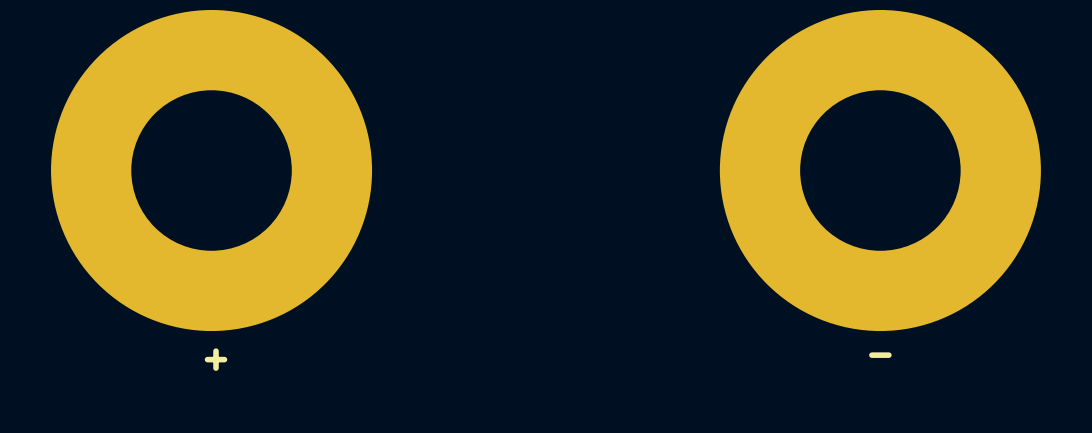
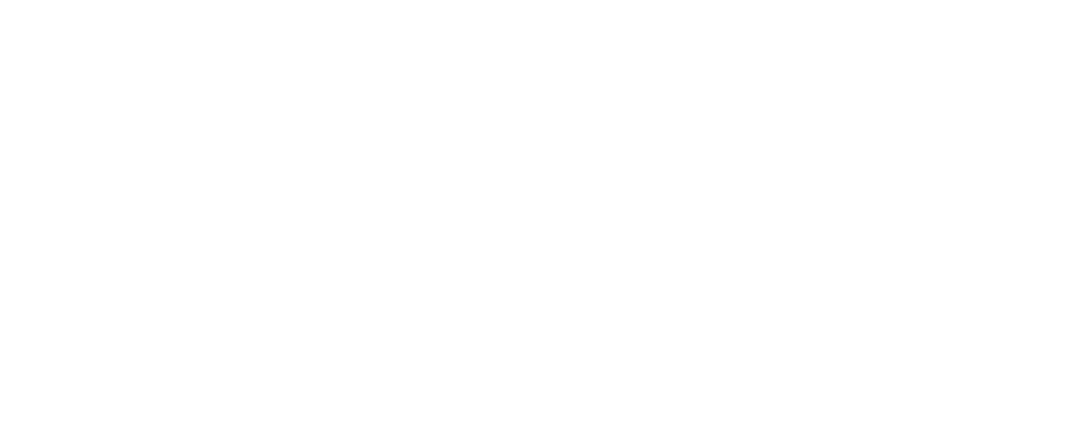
part: (211, 170) -> none
part: (880, 170) -> none
text: - (880, 355) -> none
text: + (216, 359) -> none

